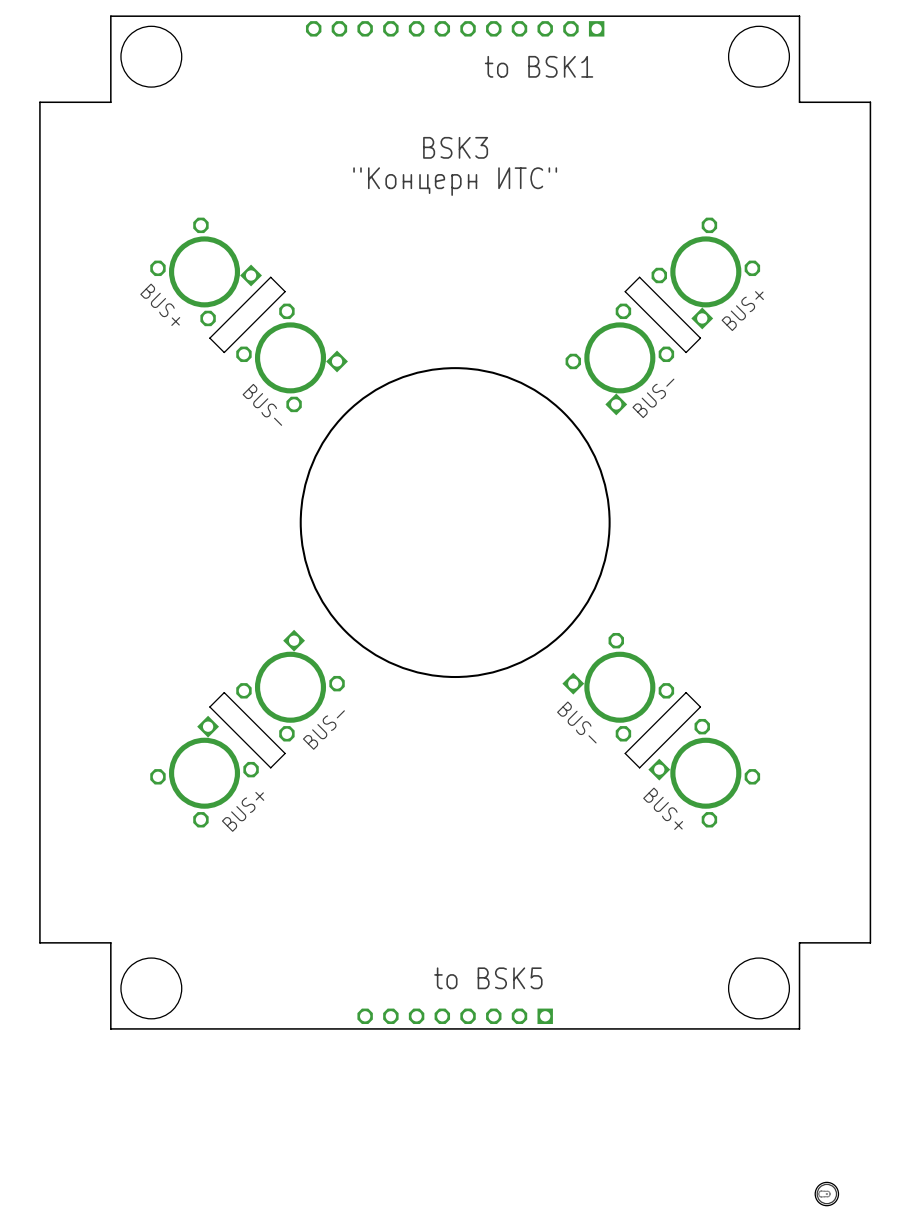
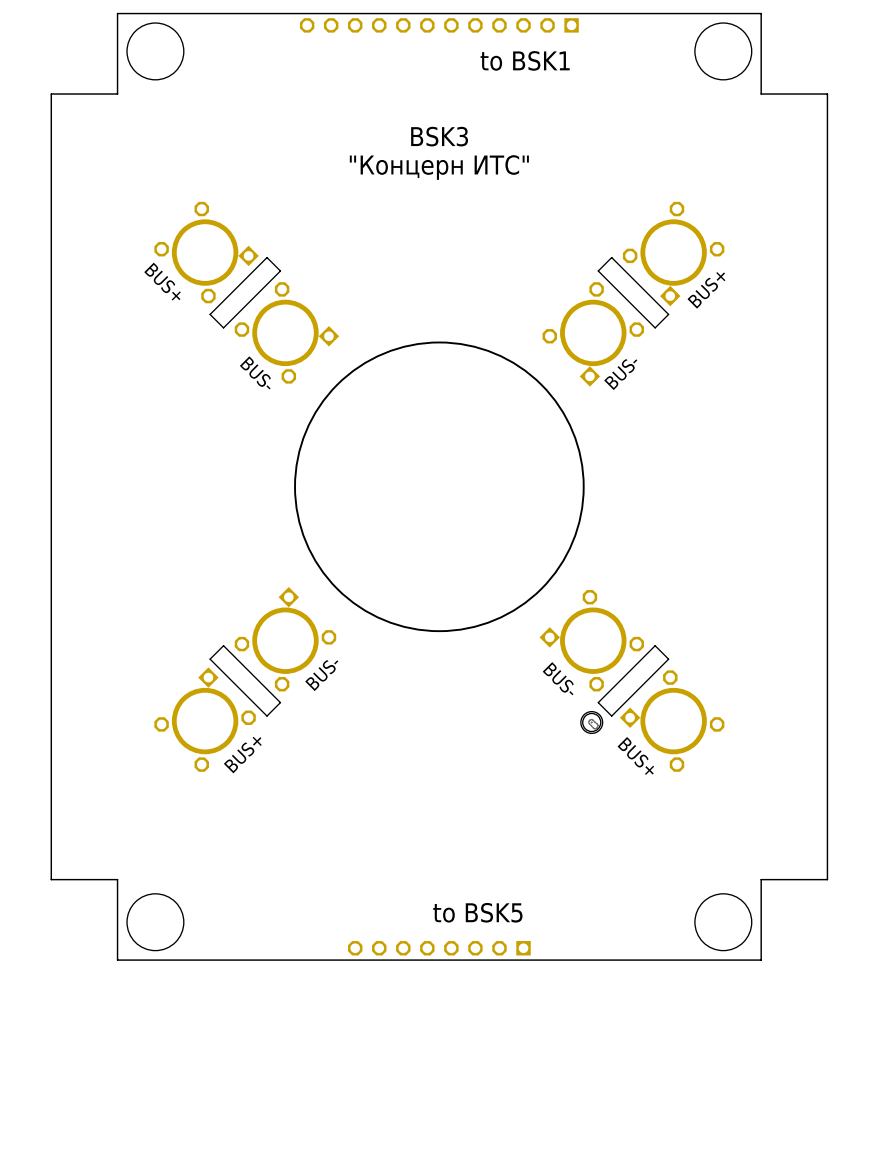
part: none -> (591, 722)
part: (826, 1194) -> none

